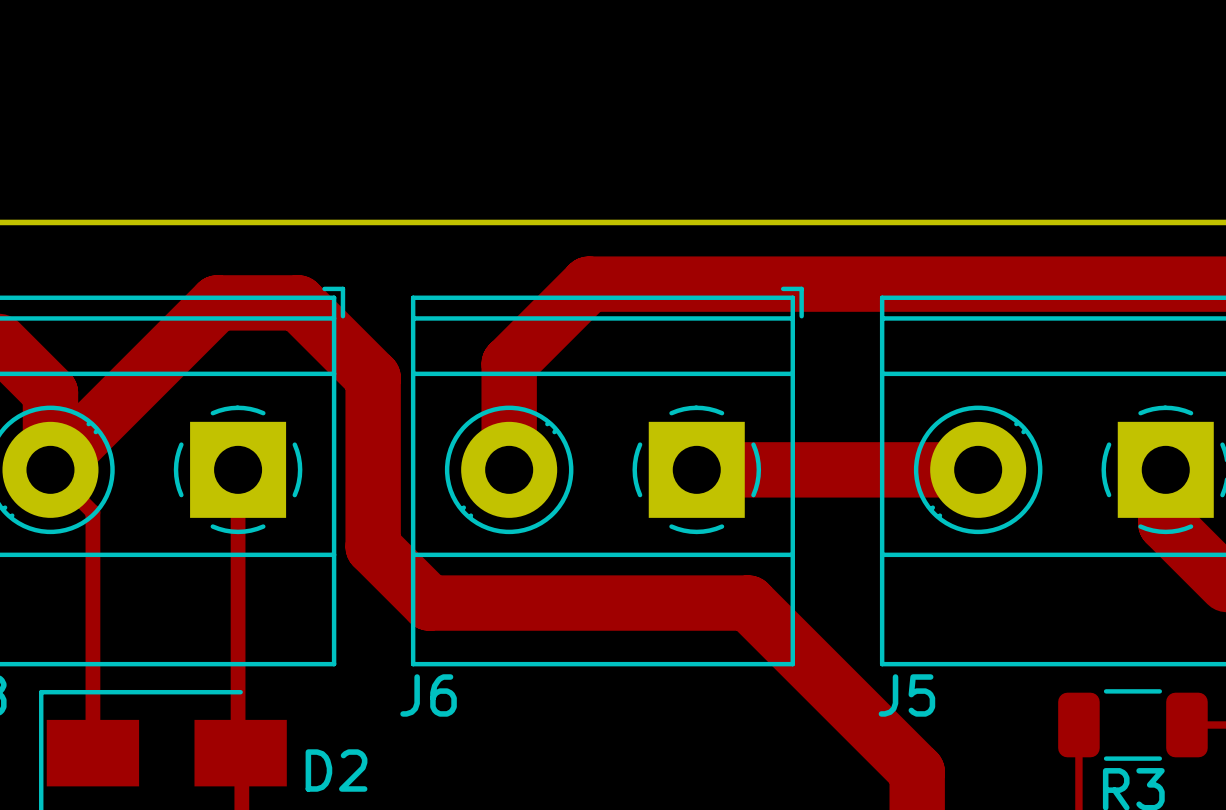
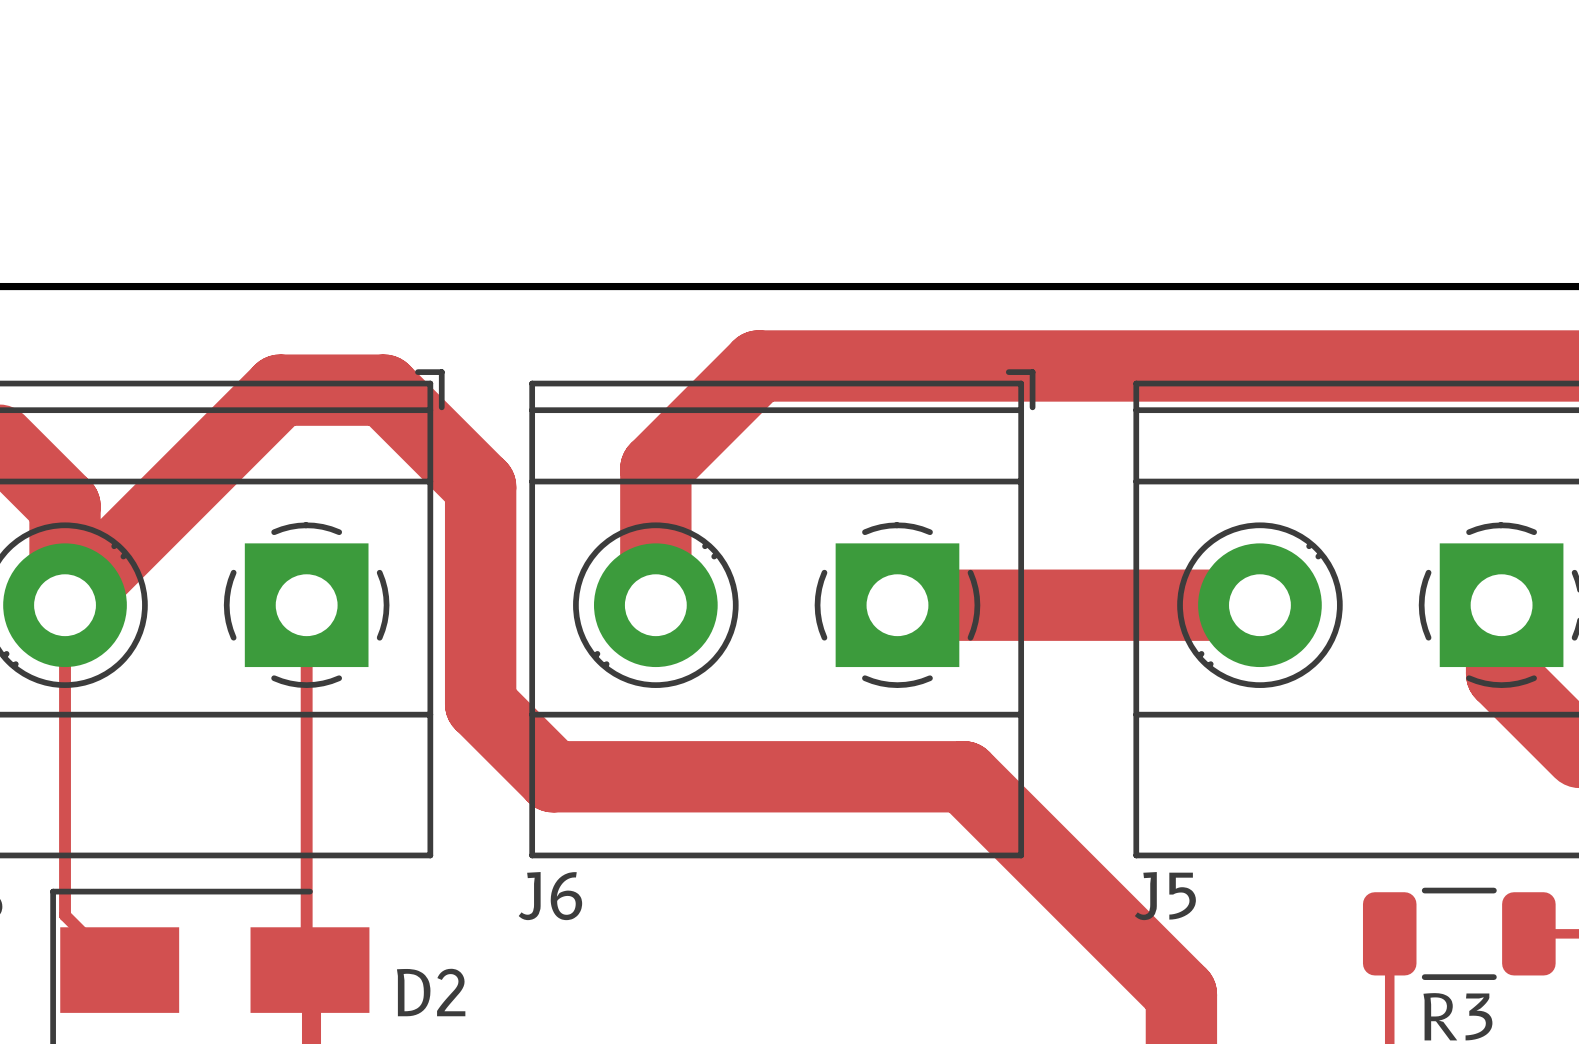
track: (50, 469) (92, 512) (92, 753) -> (65, 605) (65, 915) (119, 970)
track width: thick (238, 469) (238, 750) (240, 753) -> thin (306, 605) (306, 966) (309, 970)

